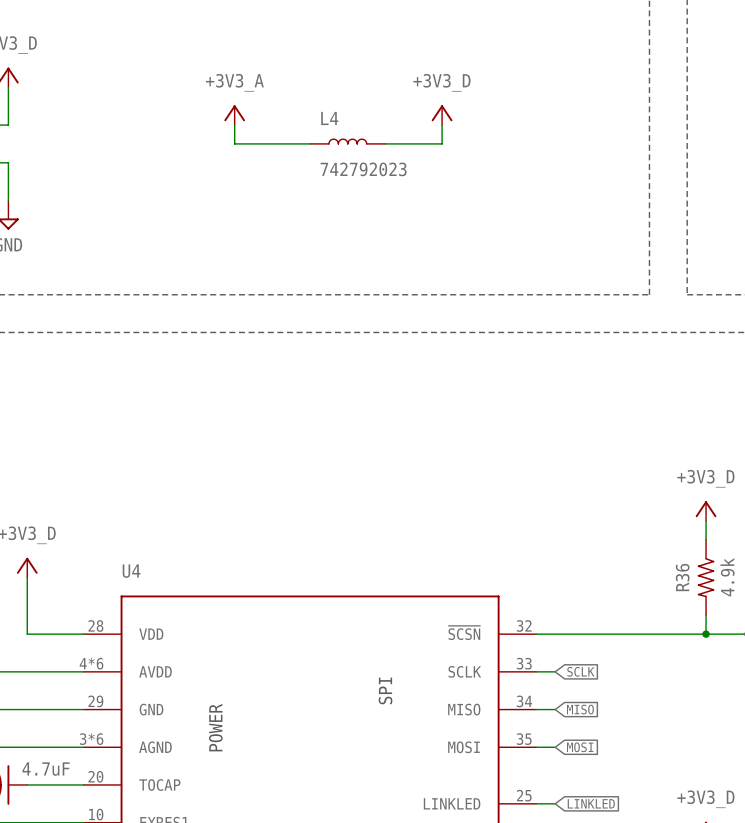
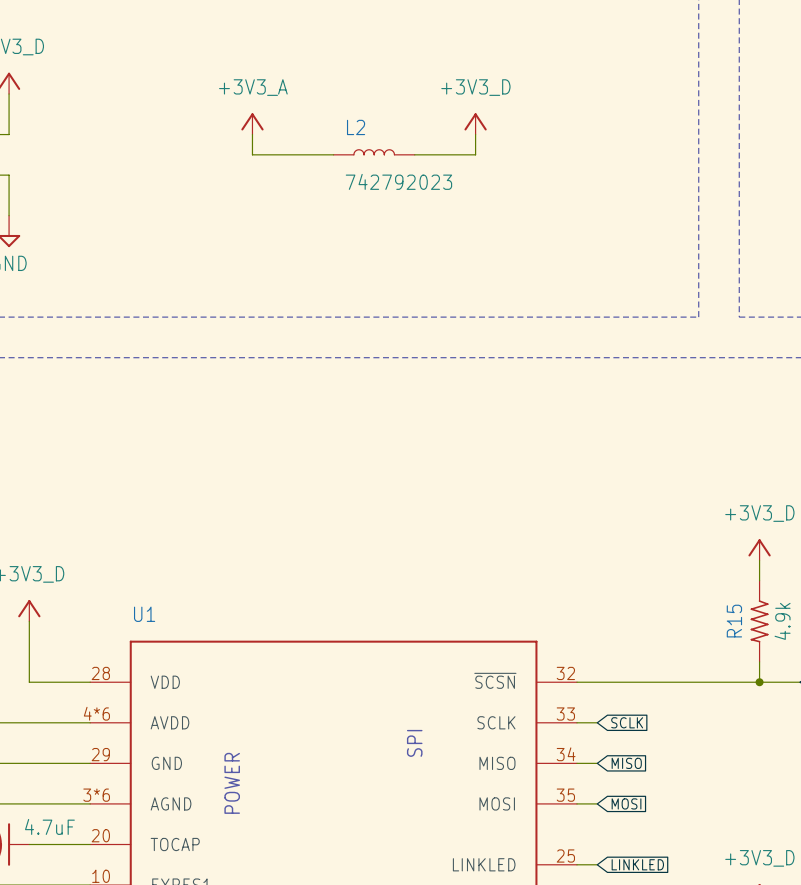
L4 name: L4 (329, 118) -> L2 (356, 127)
U4 name: U4 (131, 571) -> U1 (144, 614)
R36 name: R36 (682, 577) -> R15 (734, 621)

